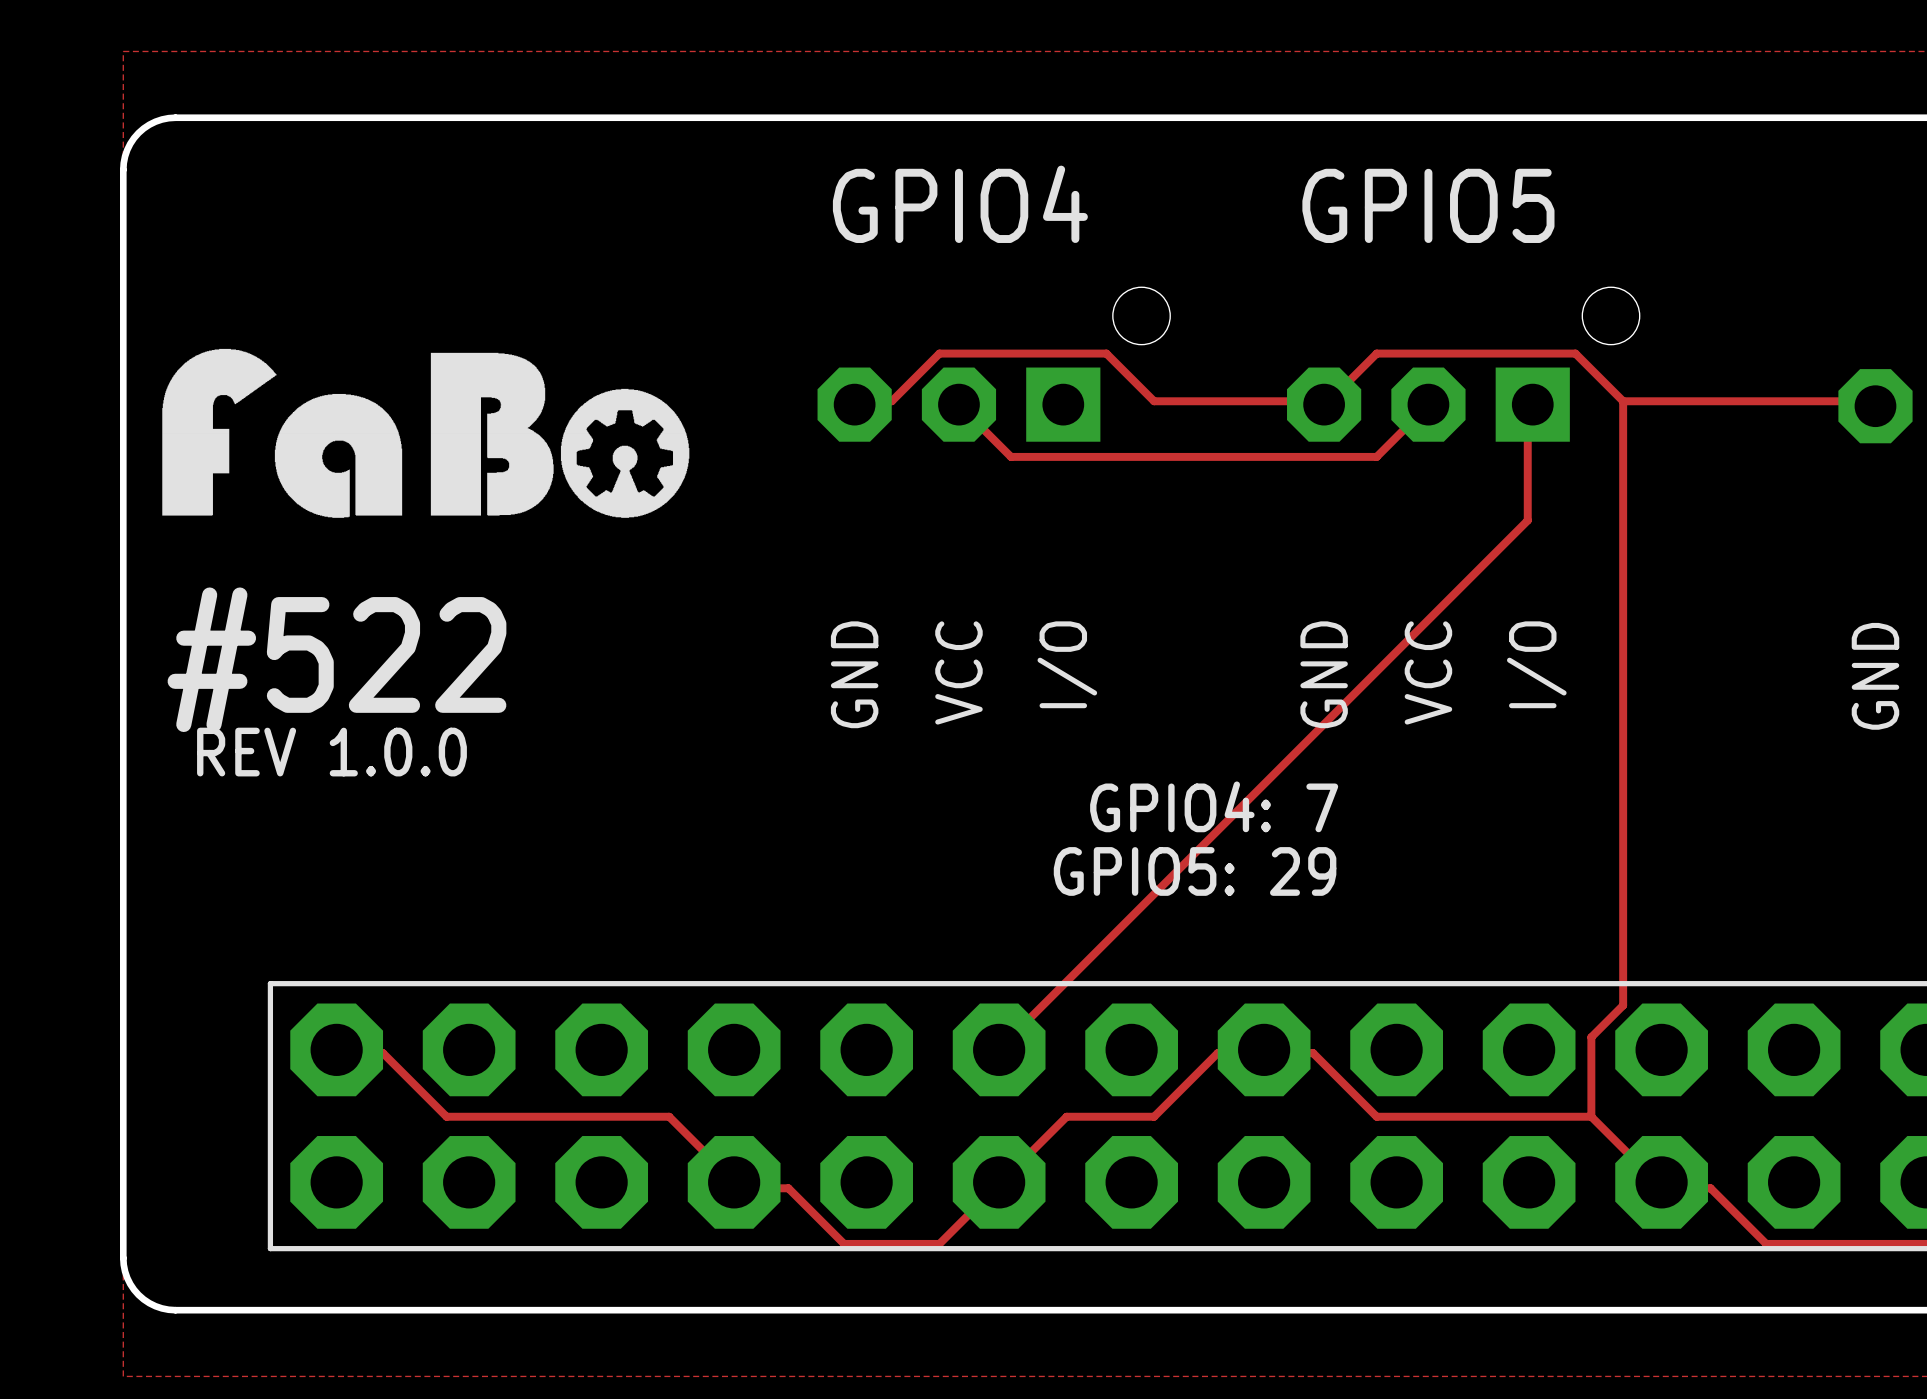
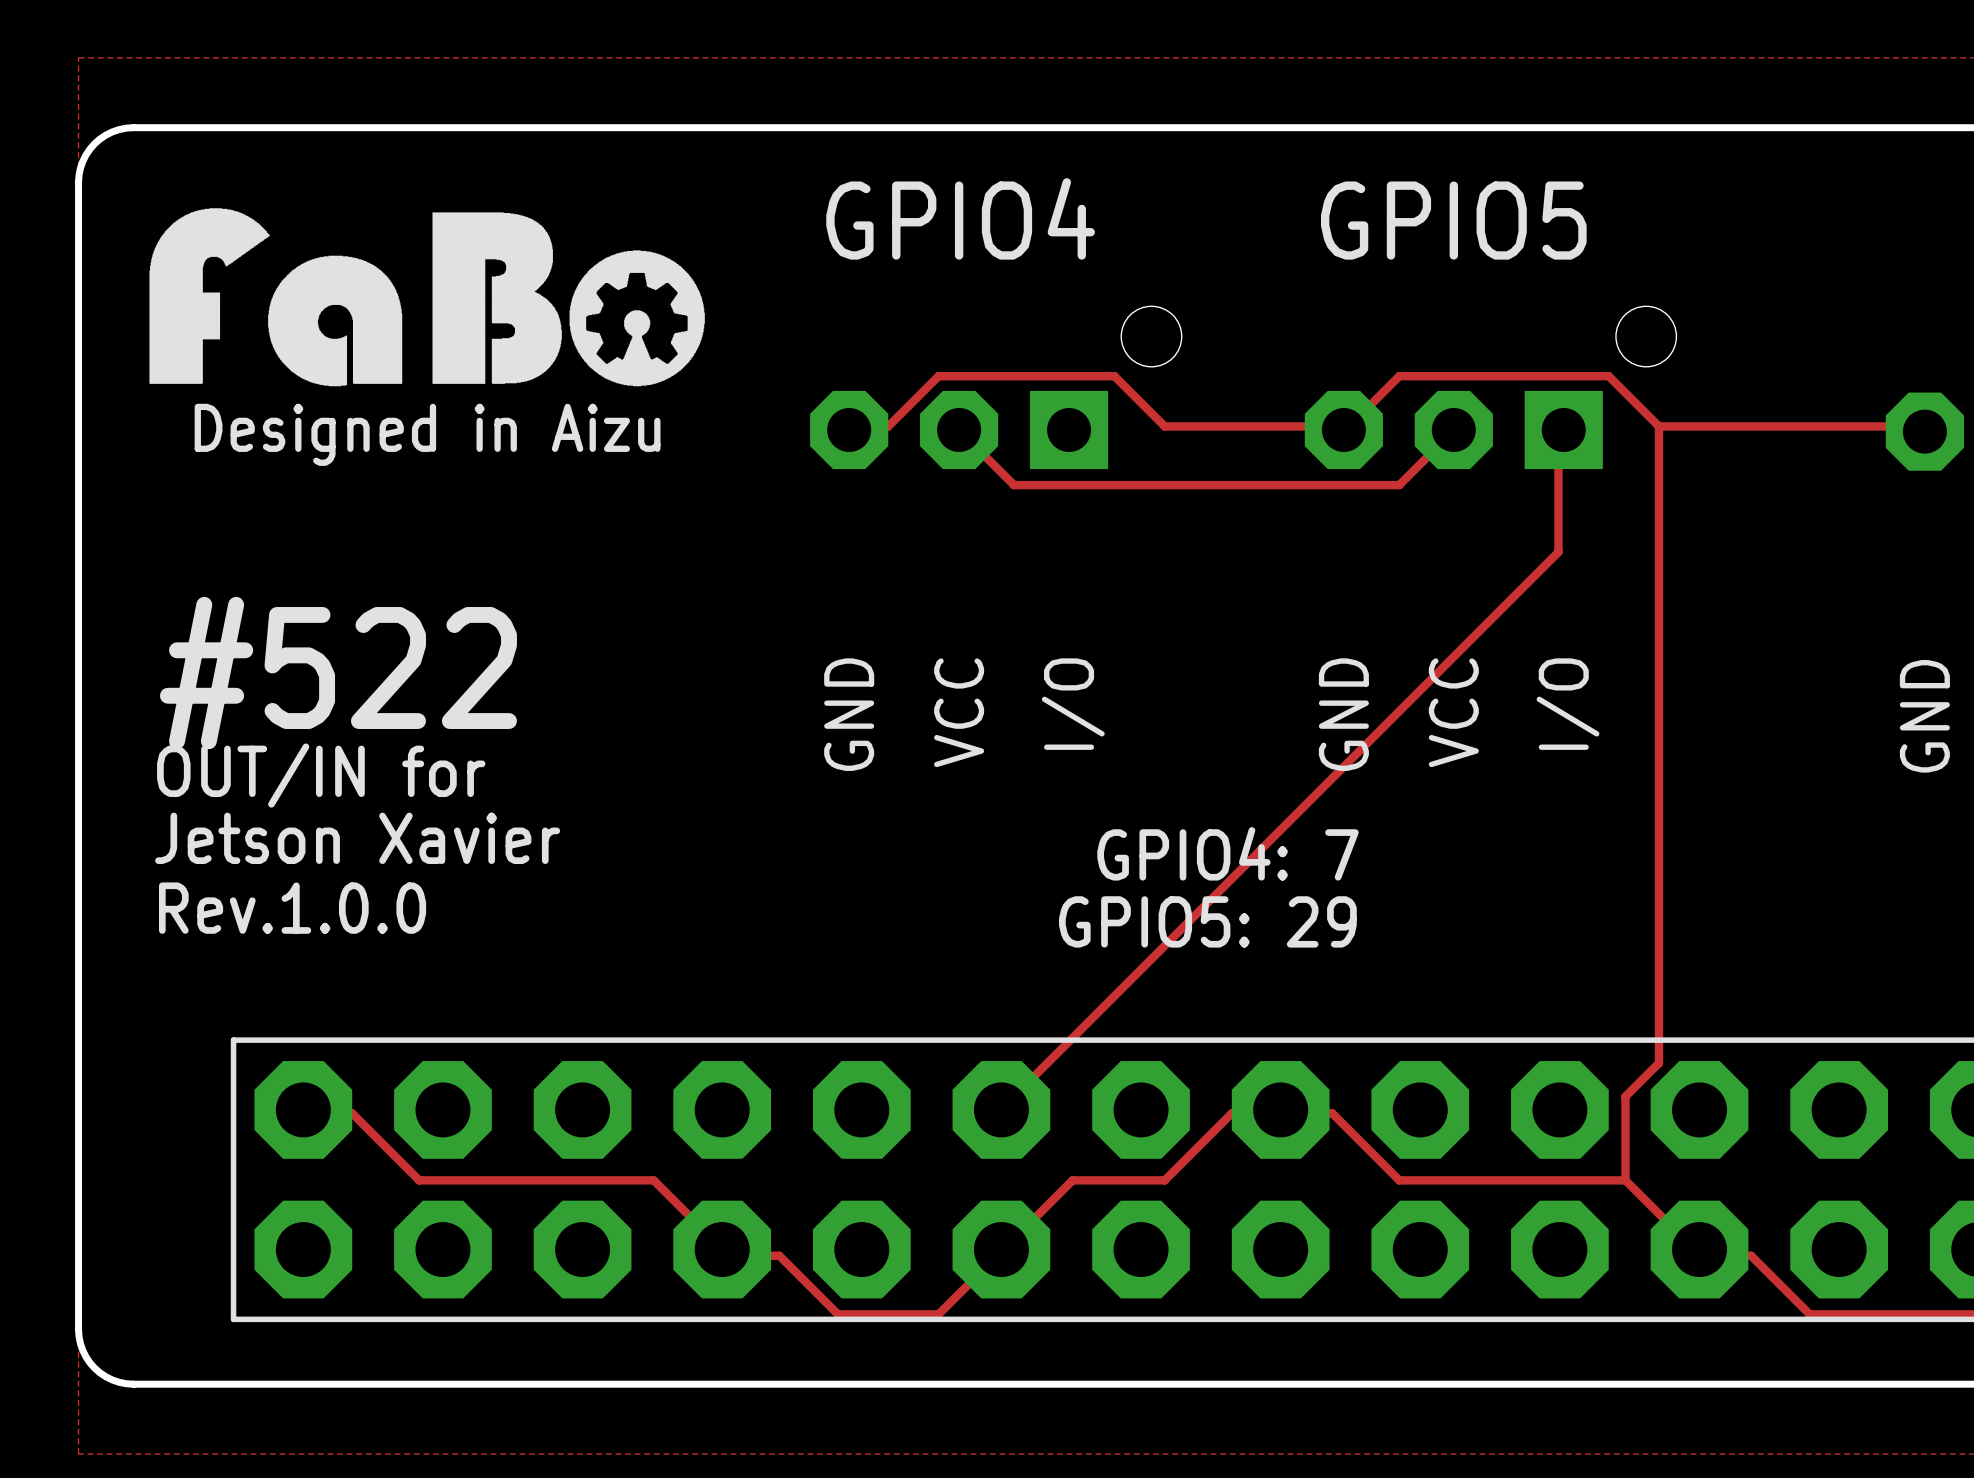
text: none -> Designed in Aizu (427, 434)
drawing position: (425, 433) -> (427, 297)
text position: #522 (336, 659) -> #522 (338, 673)
text: none -> OUT/IN for (321, 775)
text: REV 1.0.0 (331, 752) -> none
text: none -> Jetson Xavier (357, 838)
text: none -> Rev.1.0.0 (292, 908)

